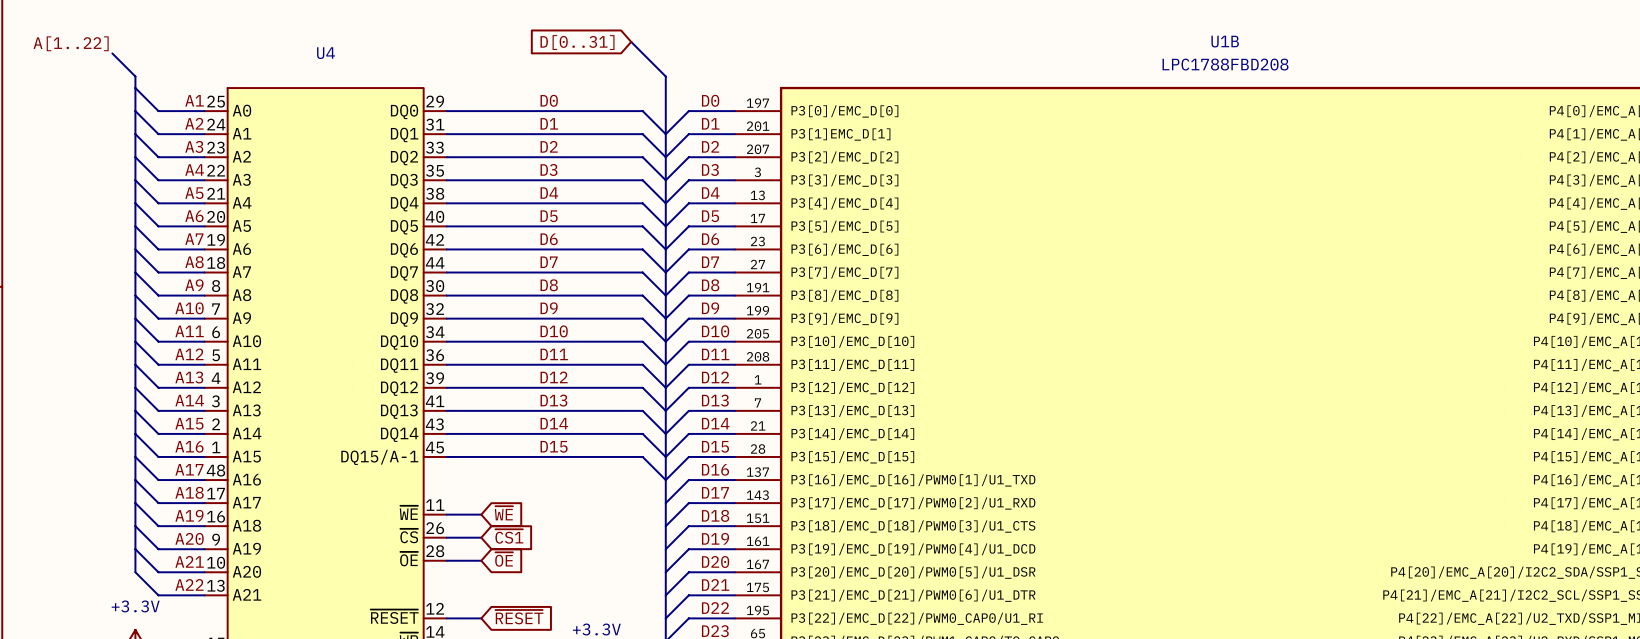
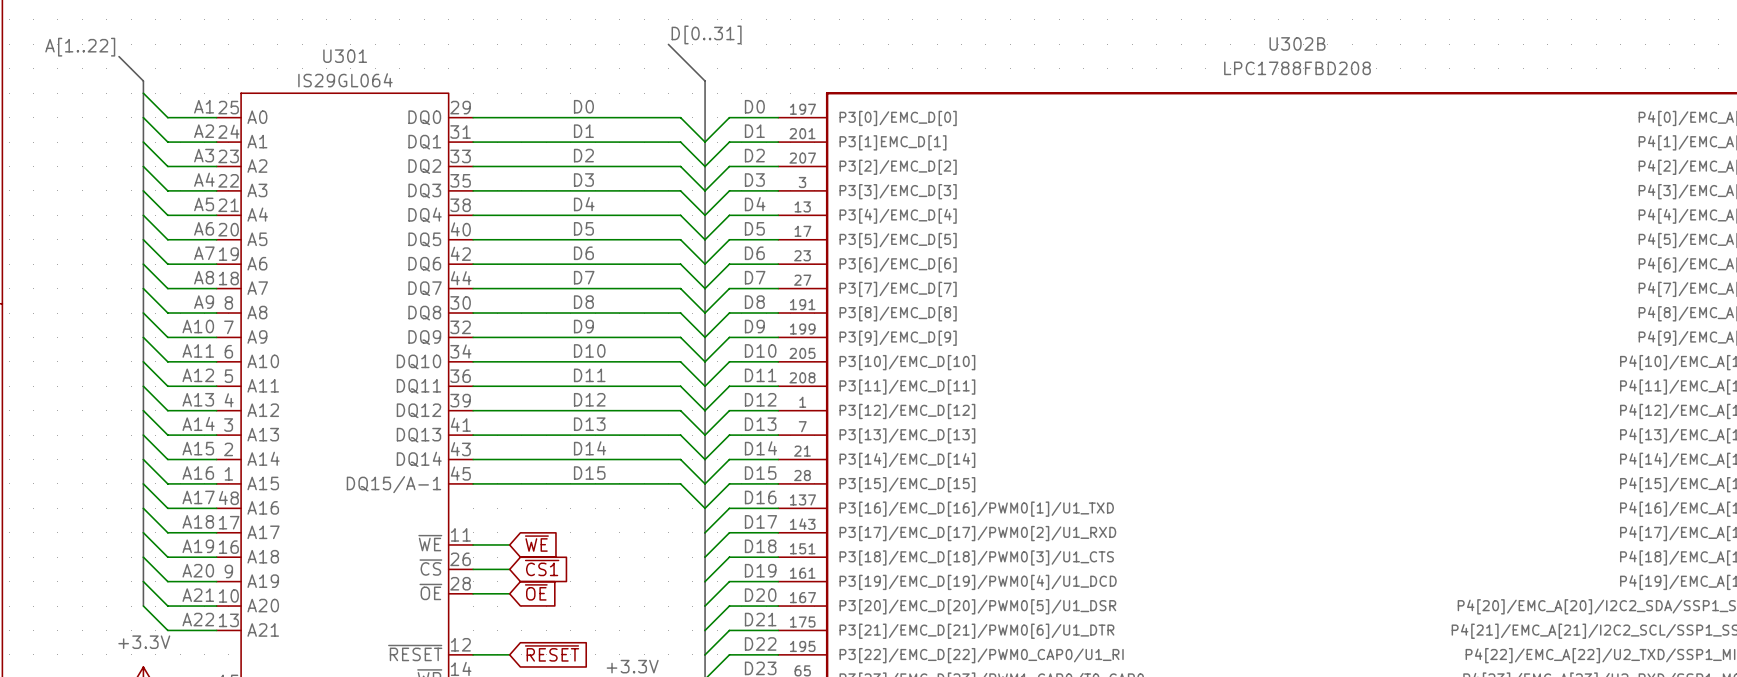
label: none -> D[0..31] (706, 34)
U1B name: U1B (1225, 41) -> U302B (1297, 43)
global label: D[0..31] (577, 42) -> none
U4 name: U4 (326, 53) -> U301 (345, 56)
U4 value: none -> IS29GL064 (345, 80)

